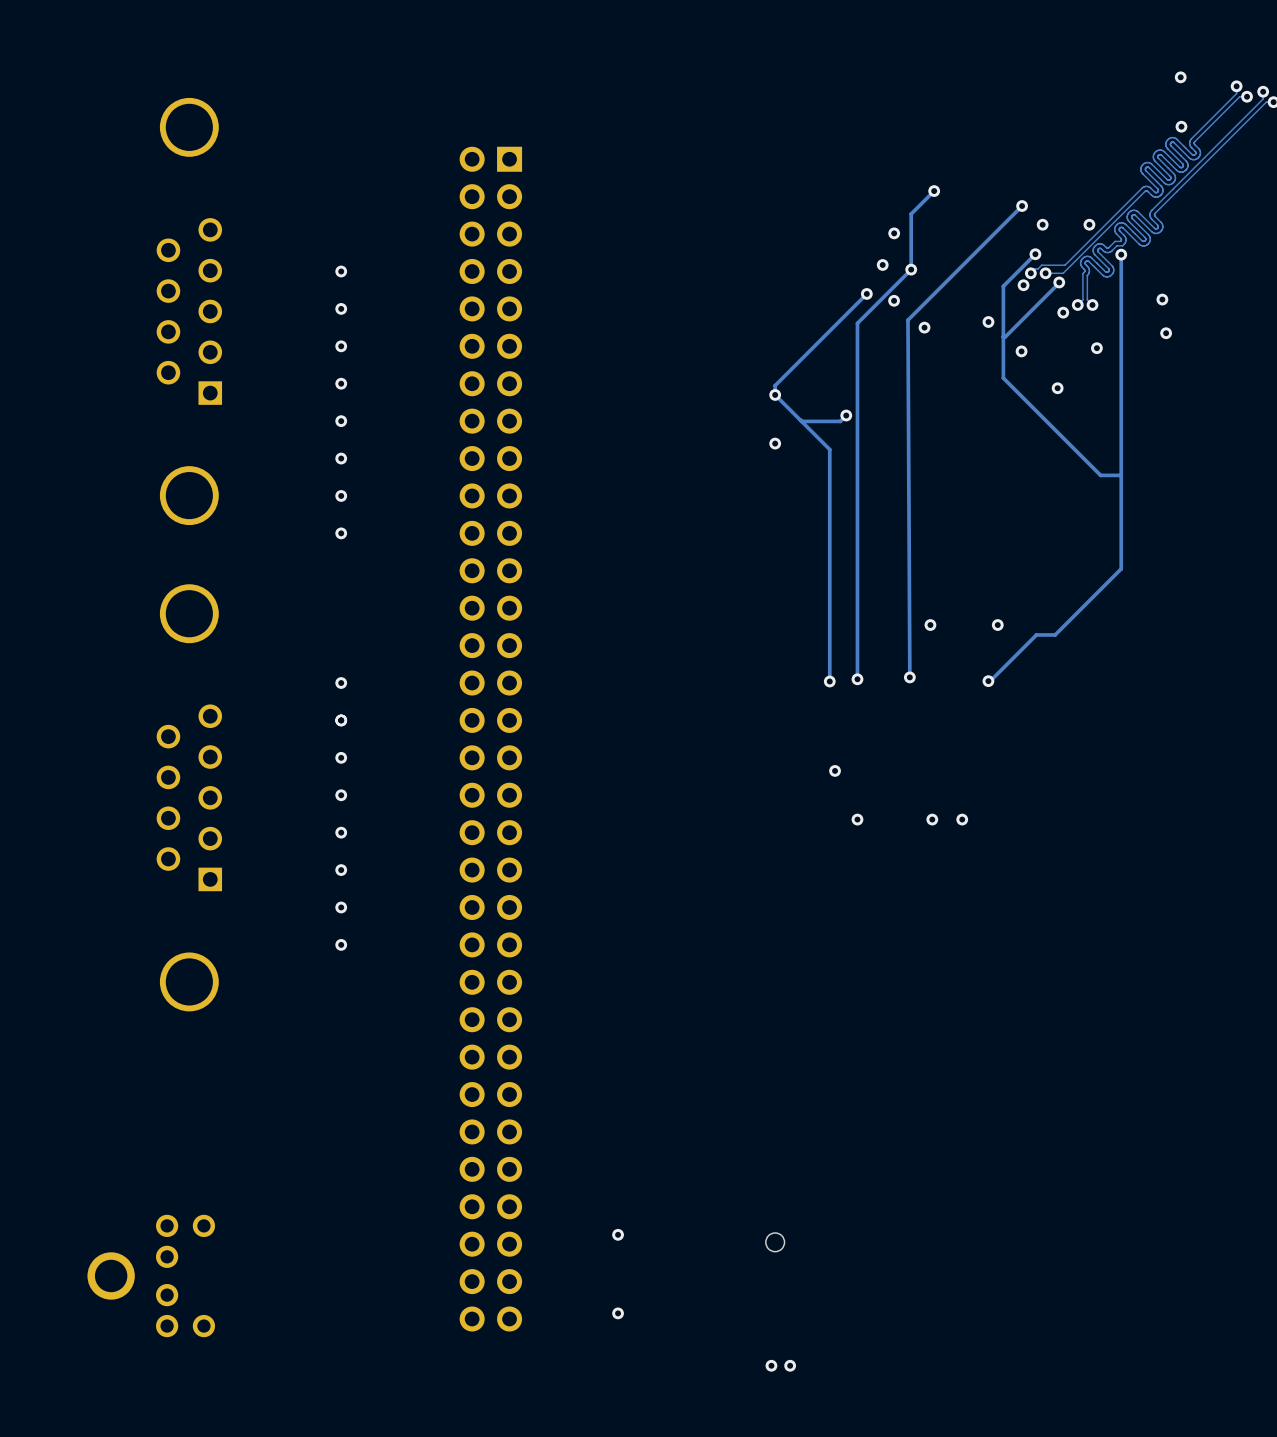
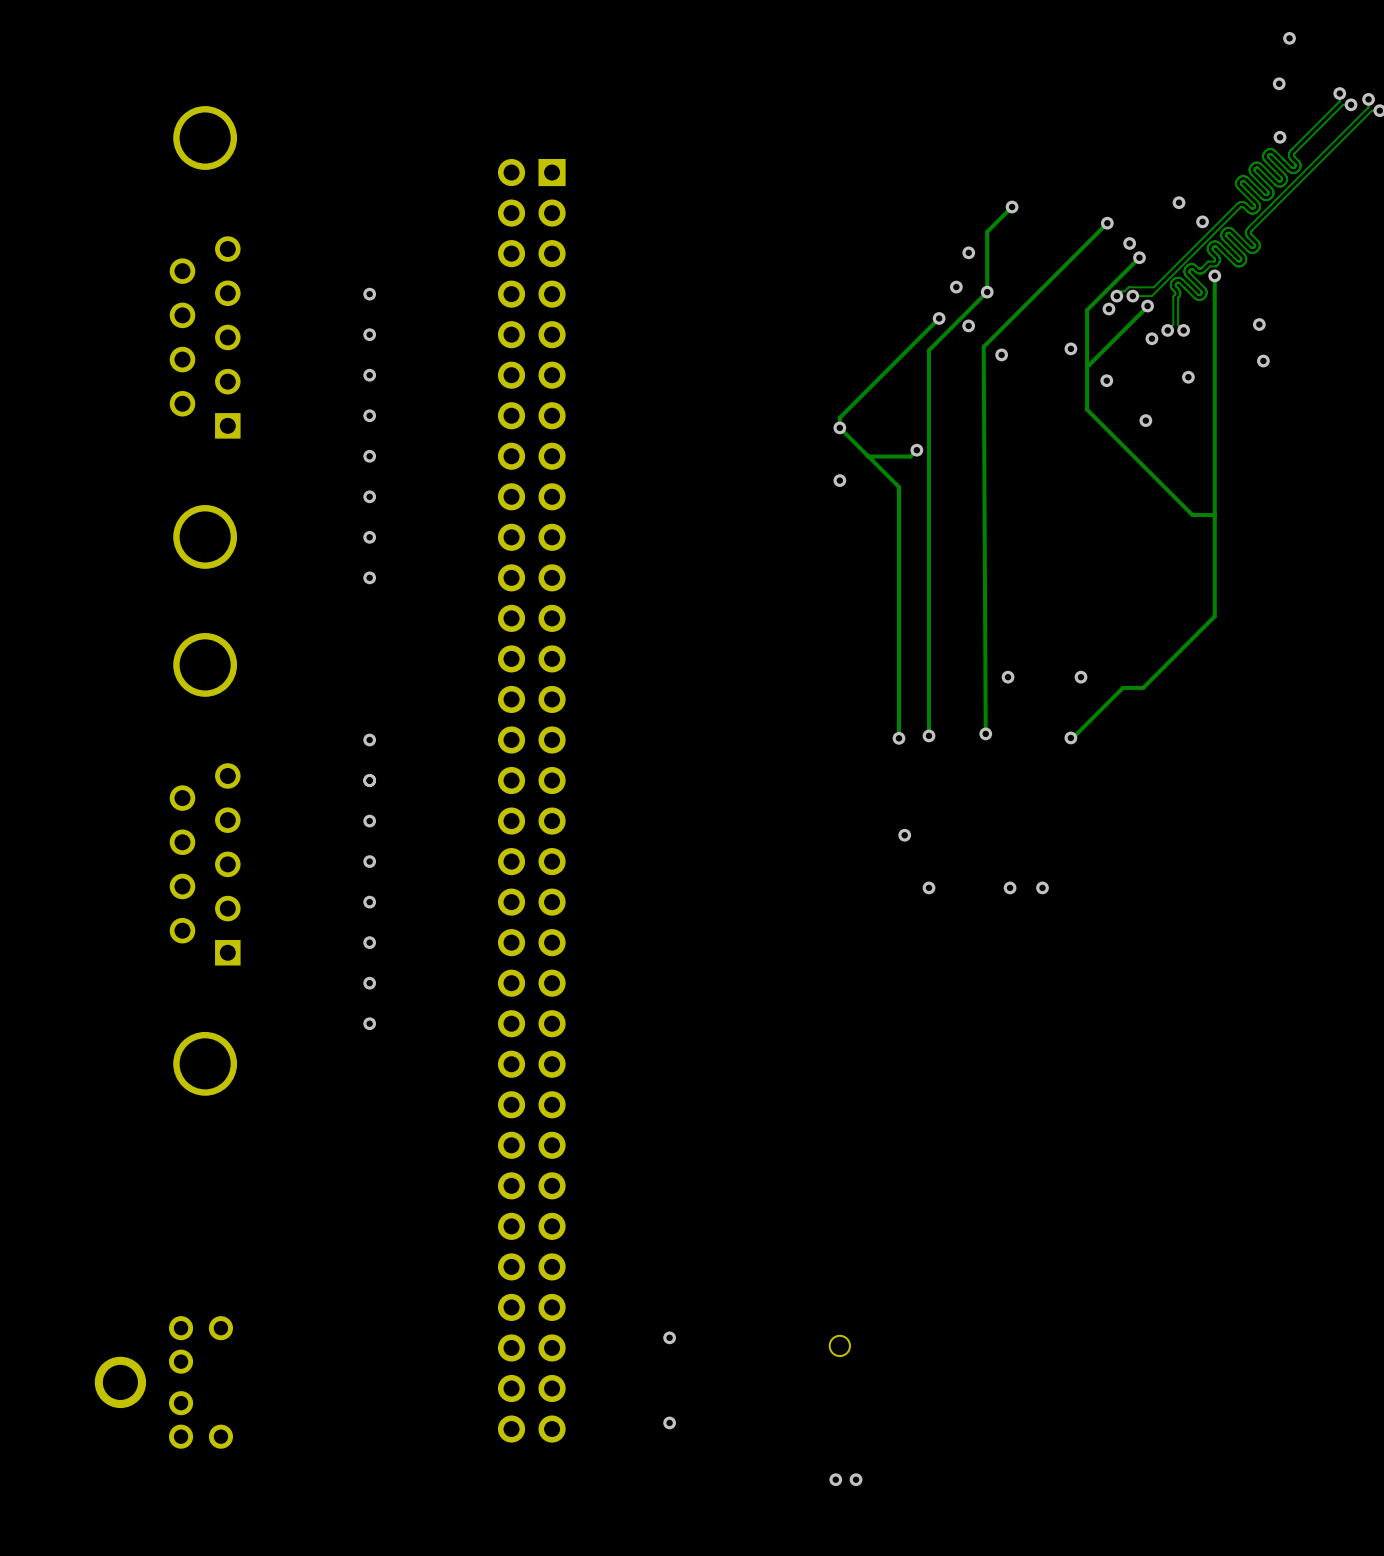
via: none -> (1289, 38)
via: none -> (1179, 202)
via: none -> (1202, 221)
via: (1089, 224) -> none
track: none -> (1139, 257) (1121, 275)
via: none -> (1139, 257)
via: (1035, 254) -> none

